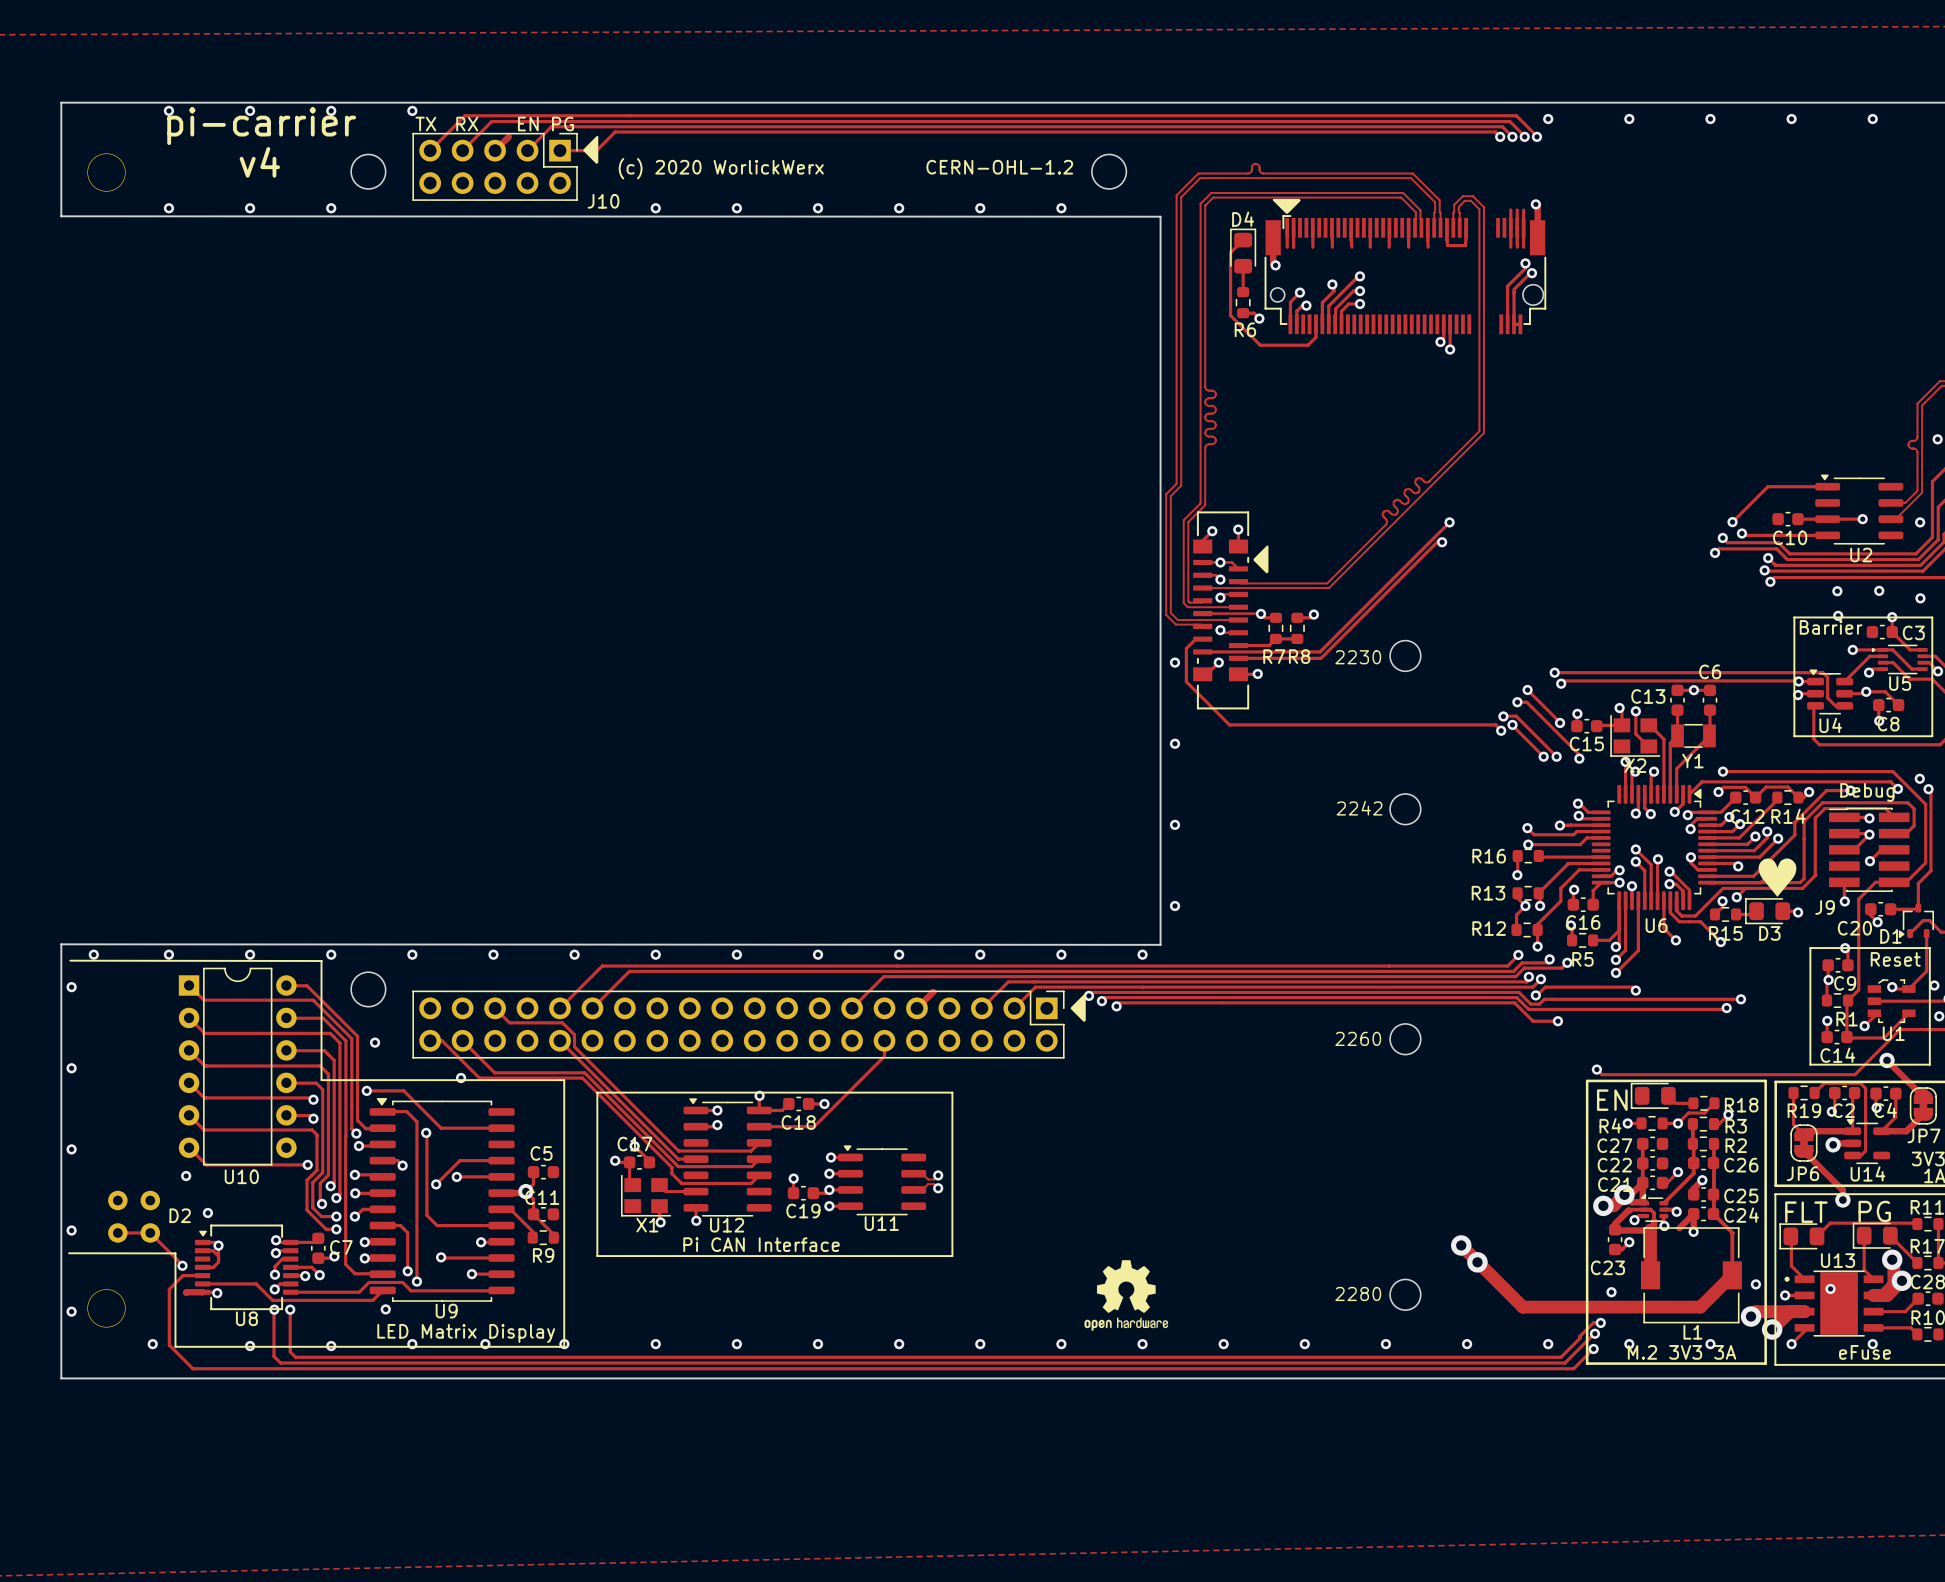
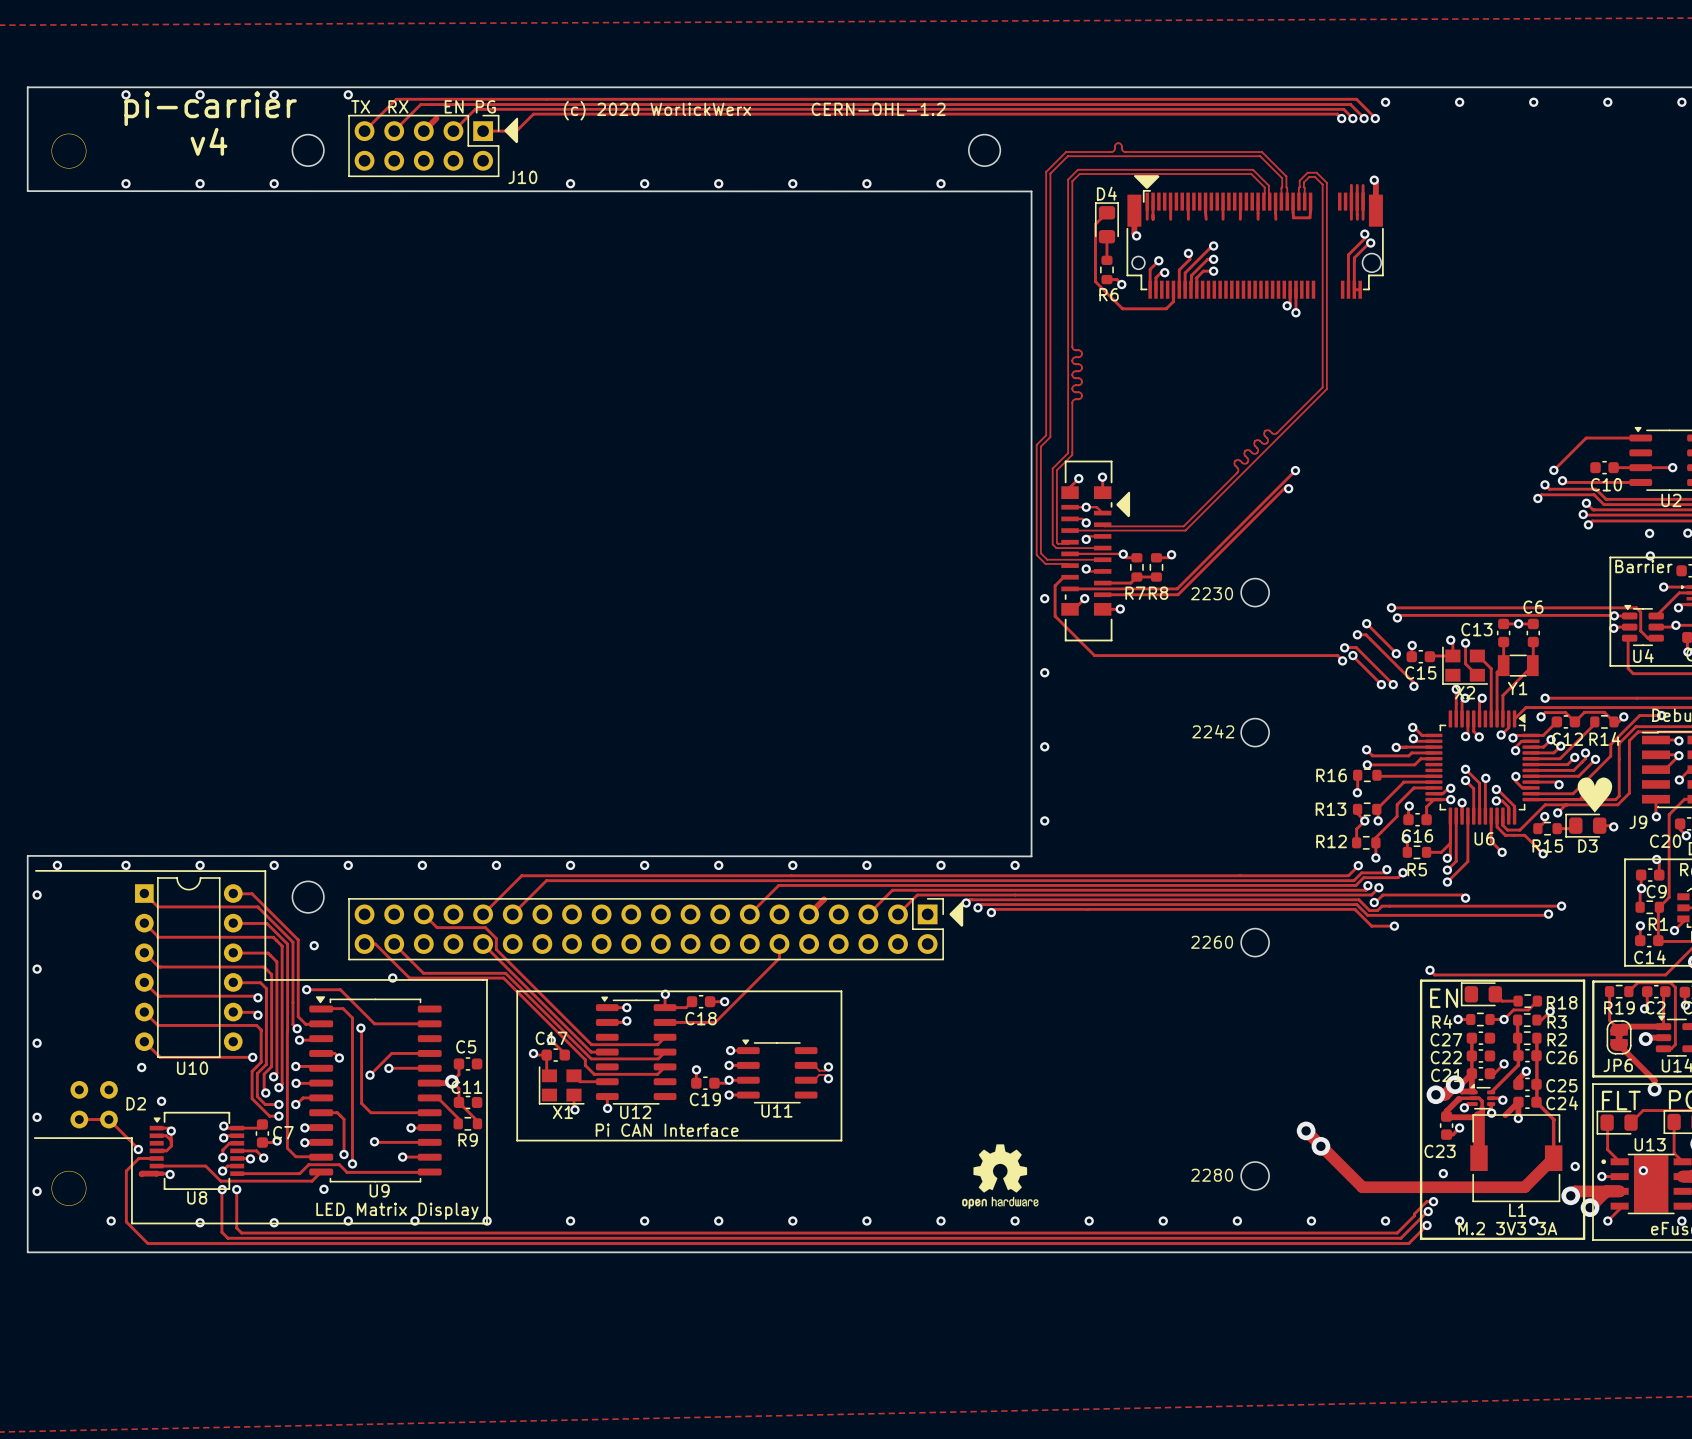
text position: CERN-OHL-1.2 (999, 167) -> CERN-OHL-1.2 (878, 109)
text position: (c) 2020 WorlickWerx (721, 168) -> (c) 2020 WorlickWerx (657, 110)

